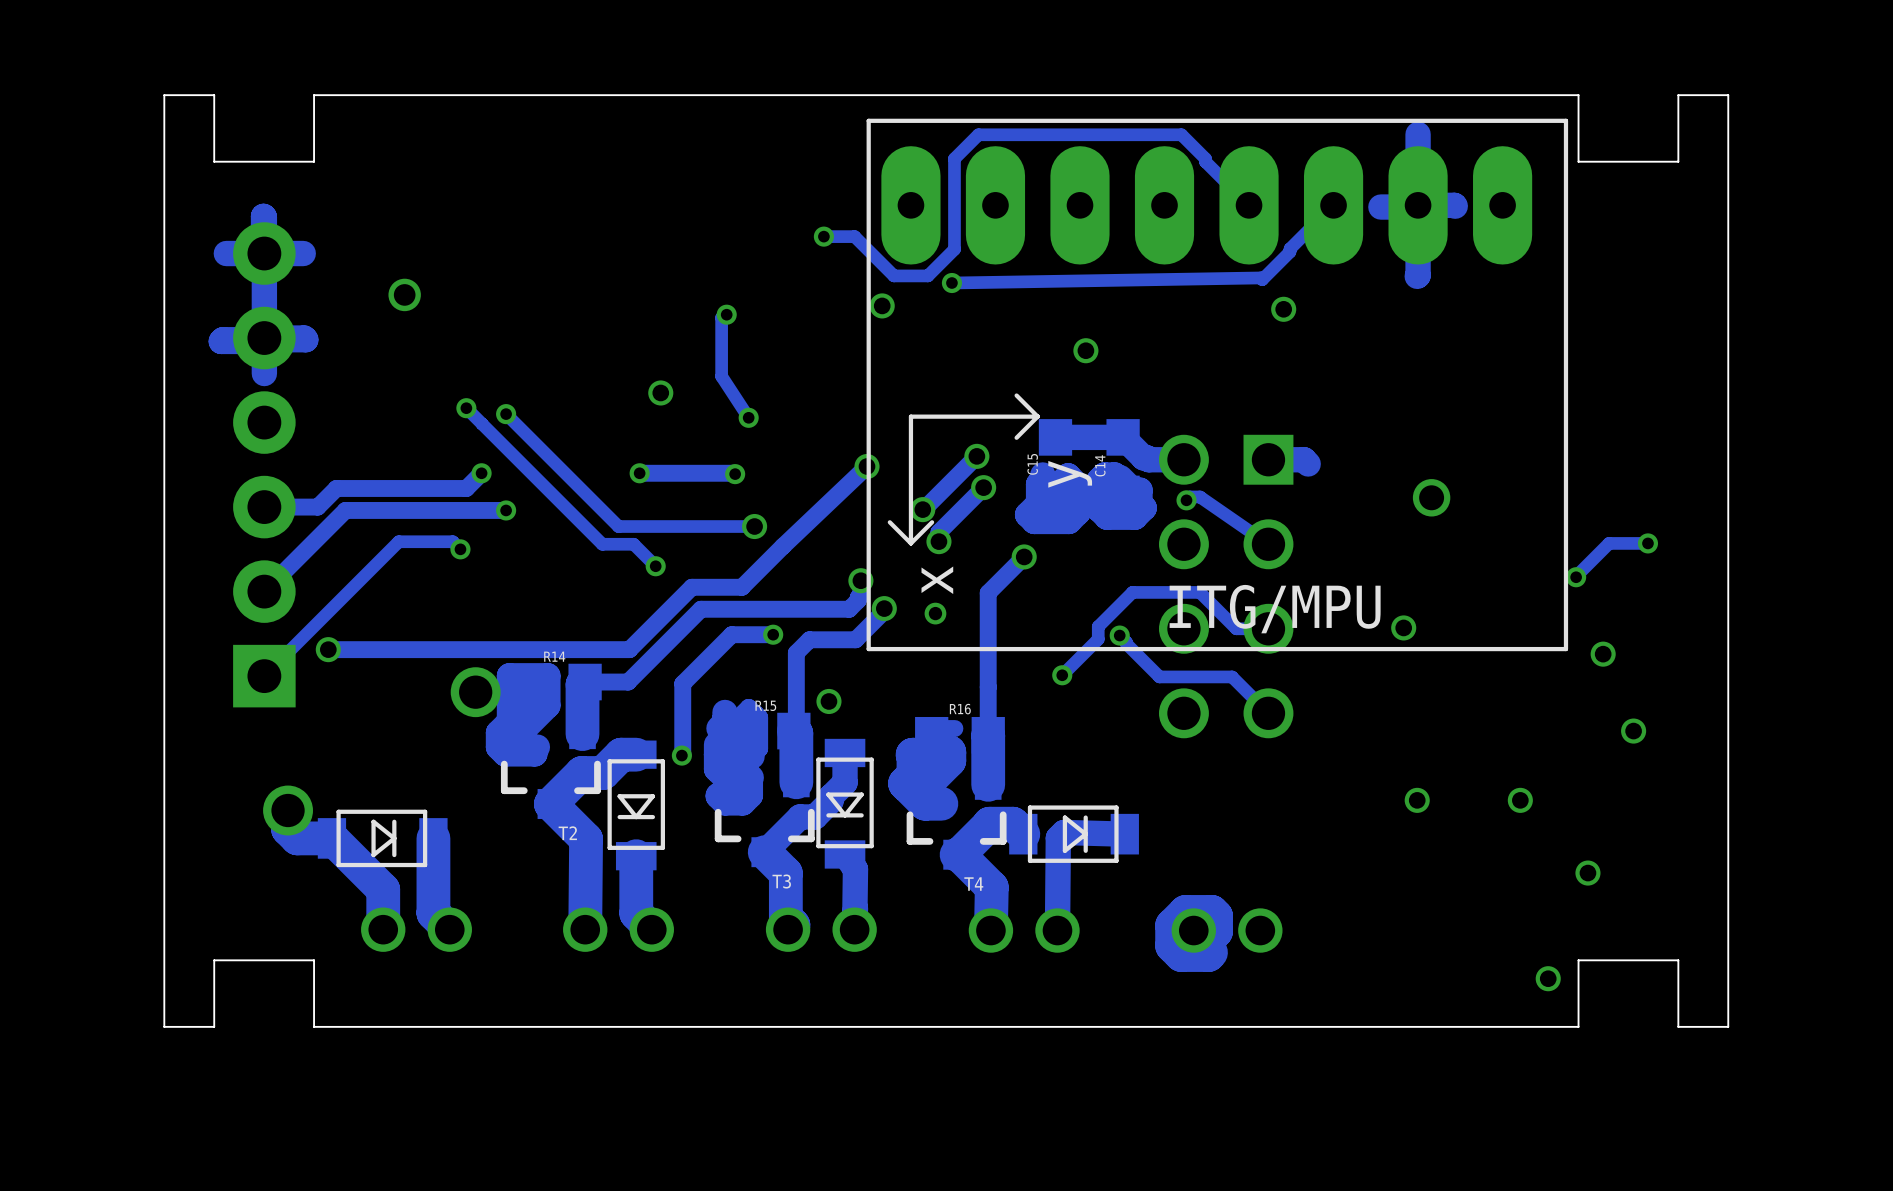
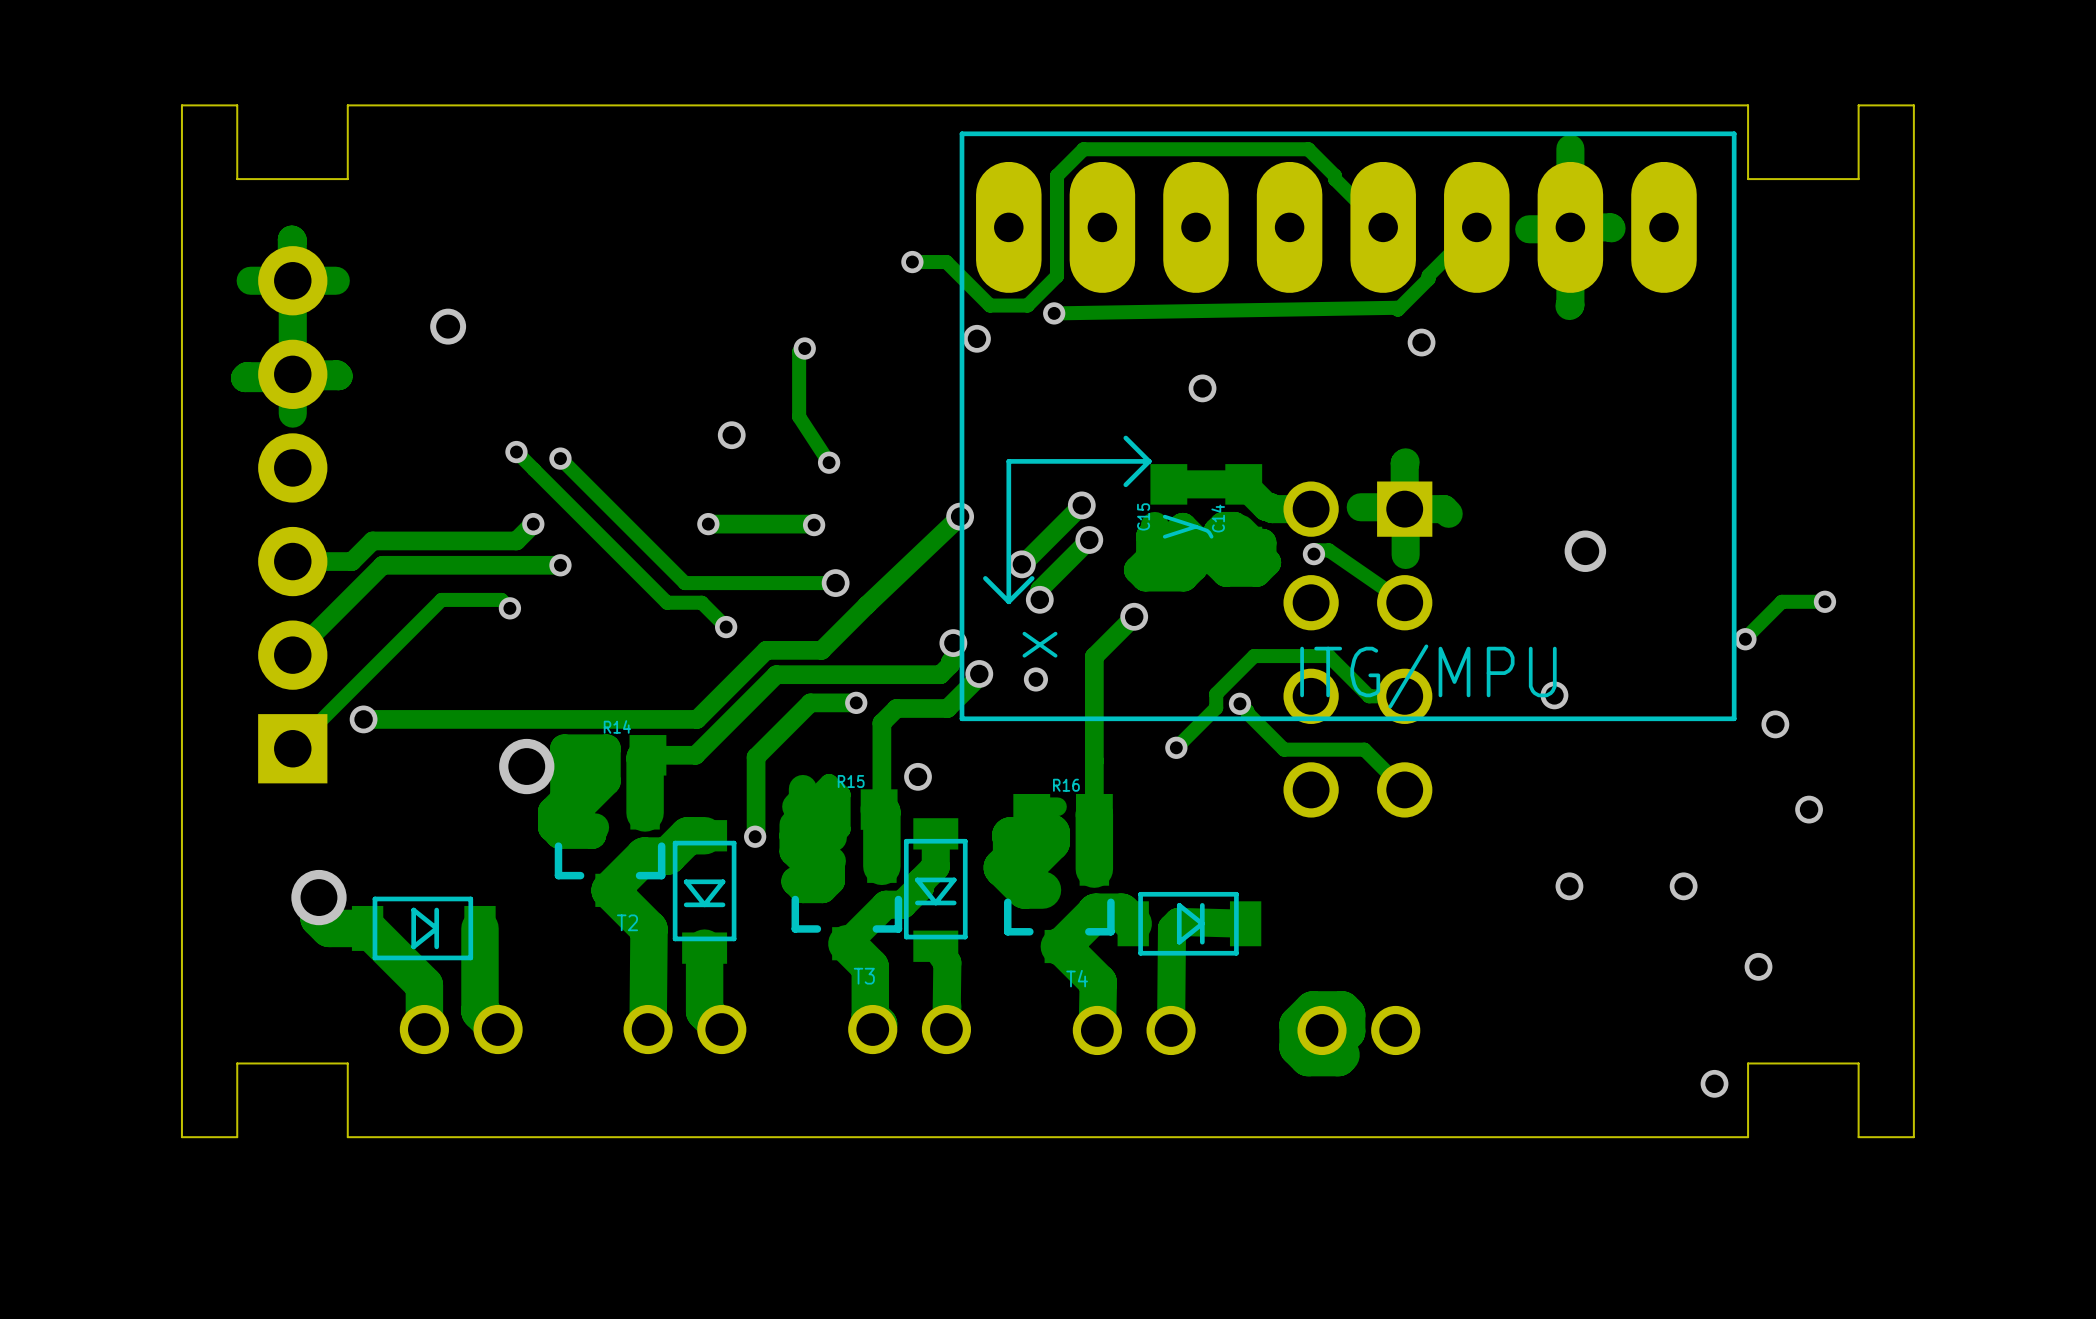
track: none -> (1405, 462) (1404, 509)
track: none -> (1360, 507) (1402, 507) (1405, 510) (1405, 554)

